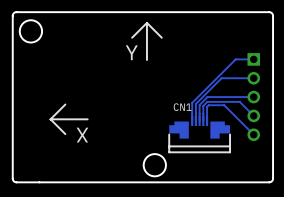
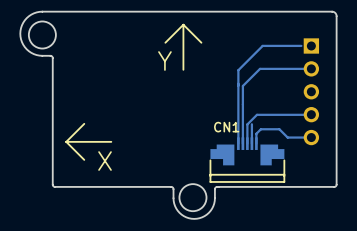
board edge: (30, 12) (15, 12) (12, 15) (12, 178) (14, 181) (269, 182) (273, 179) (273, 154) -> (42, 11) (33, 13) (26, 18) (21, 25) (20, 36) (23, 44) (31, 52) (52, 57) (53, 186) (171, 187) (174, 203) (177, 210) (186, 217) (194, 218) (202, 217) (210, 210) (214, 203) (216, 187) (334, 186) (336, 184)
track: (253, 59) (235, 59) (192, 102) -> (301, 45) (262, 45) (238, 70) (238, 121)
track: (253, 78) (221, 78) (195, 103) -> (311, 68) (260, 68) (242, 86) (242, 123)
part position: (253, 97) -> (311, 91)
track: (203, 105) (207, 101) (239, 101) (253, 115) -> (251, 125) (251, 124)
track: (207, 112) (208, 105) (224, 105) (253, 134) -> (256, 133) (260, 129) (279, 129) (287, 137) (311, 137)

